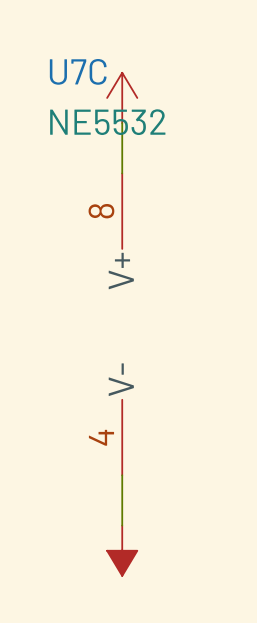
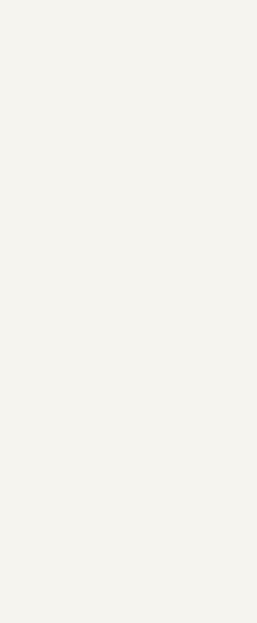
power symbol: (122, 97) -> none
wire: (122, 123) (122, 173) -> none
U7C: NE5532 (122, 324) -> none
wire: (122, 475) (122, 525) -> none
power symbol: (122, 550) -> none

